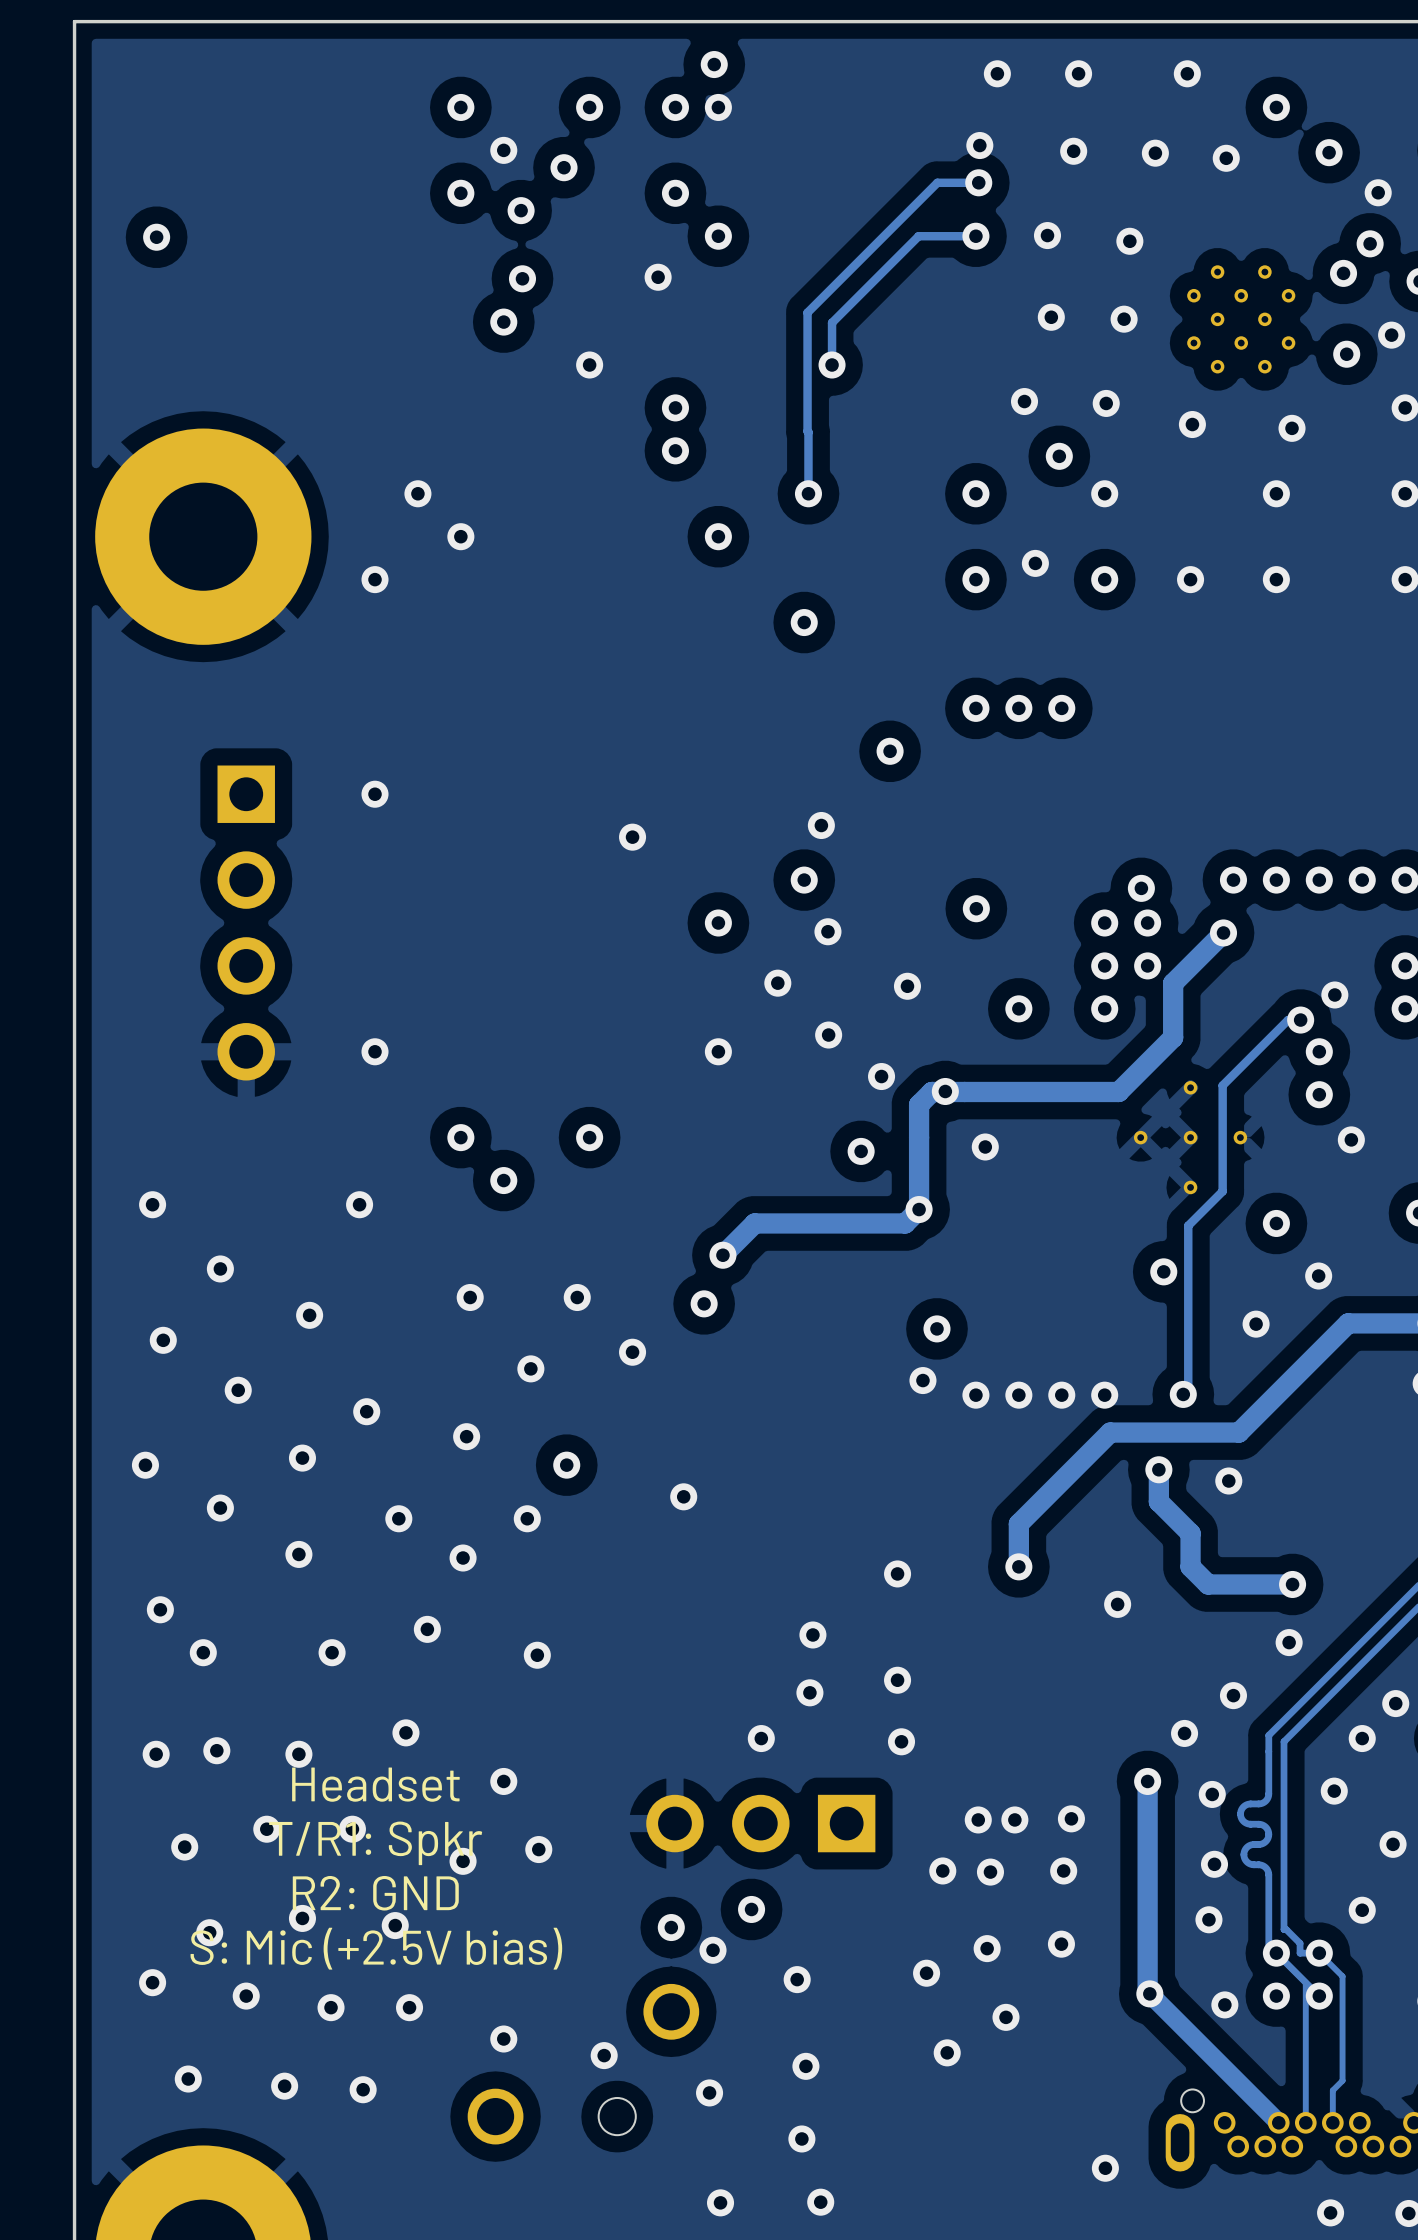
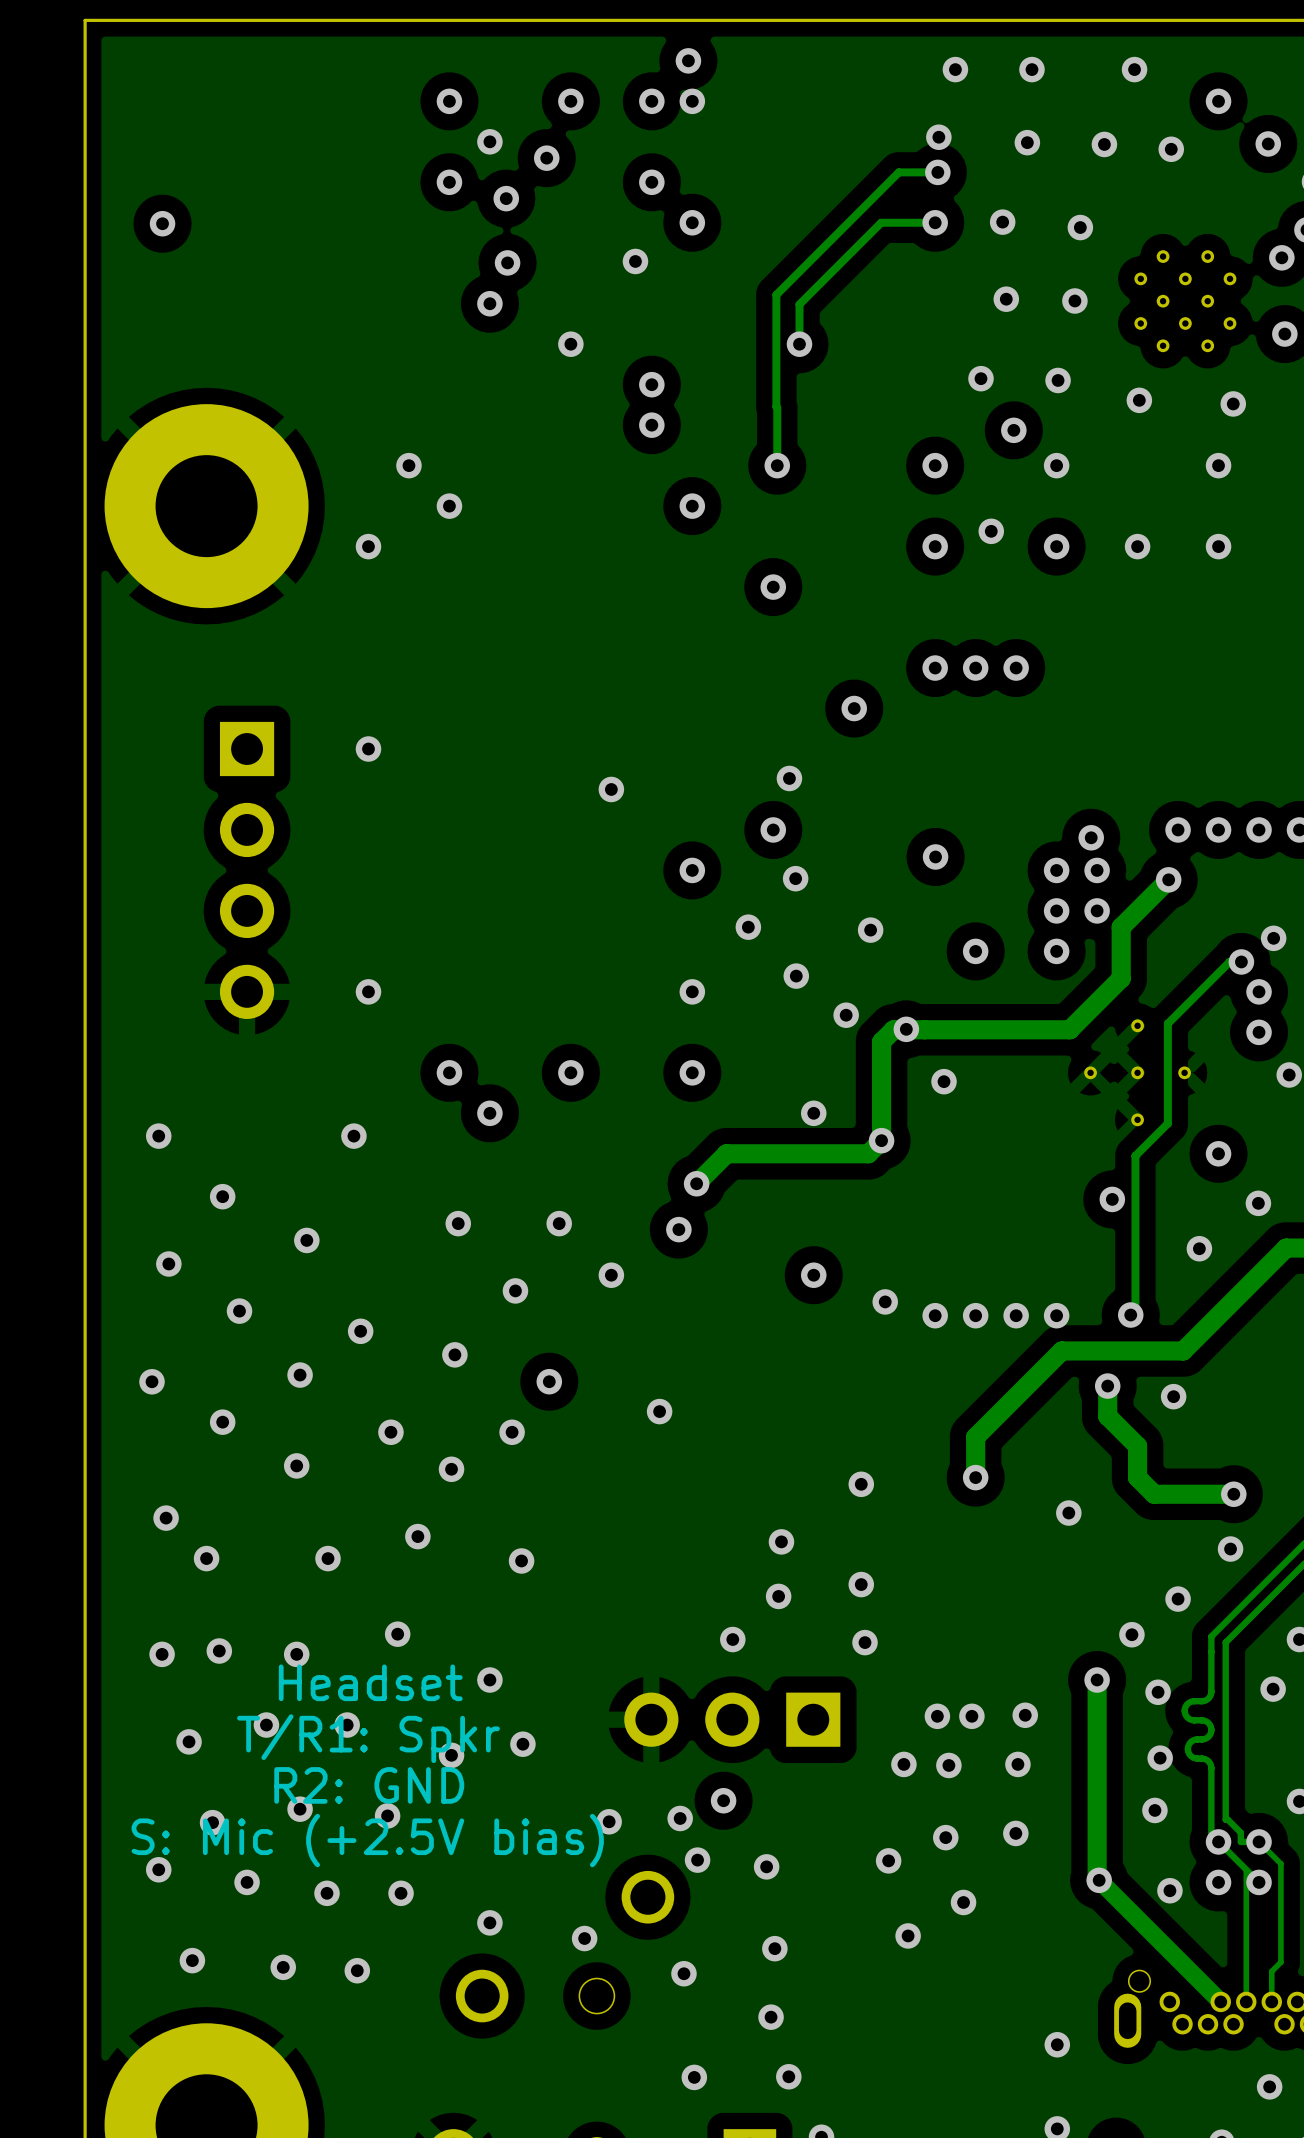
via: none -> (692, 1072)
via position: (861, 1151) -> (813, 1113)
via: (936, 1328) -> none
via: none -> (813, 1275)
via: (671, 1927) -> none
via: none -> (680, 1818)
via: none -> (609, 1821)
via: (713, 1950) -> none
via: none -> (697, 1860)

